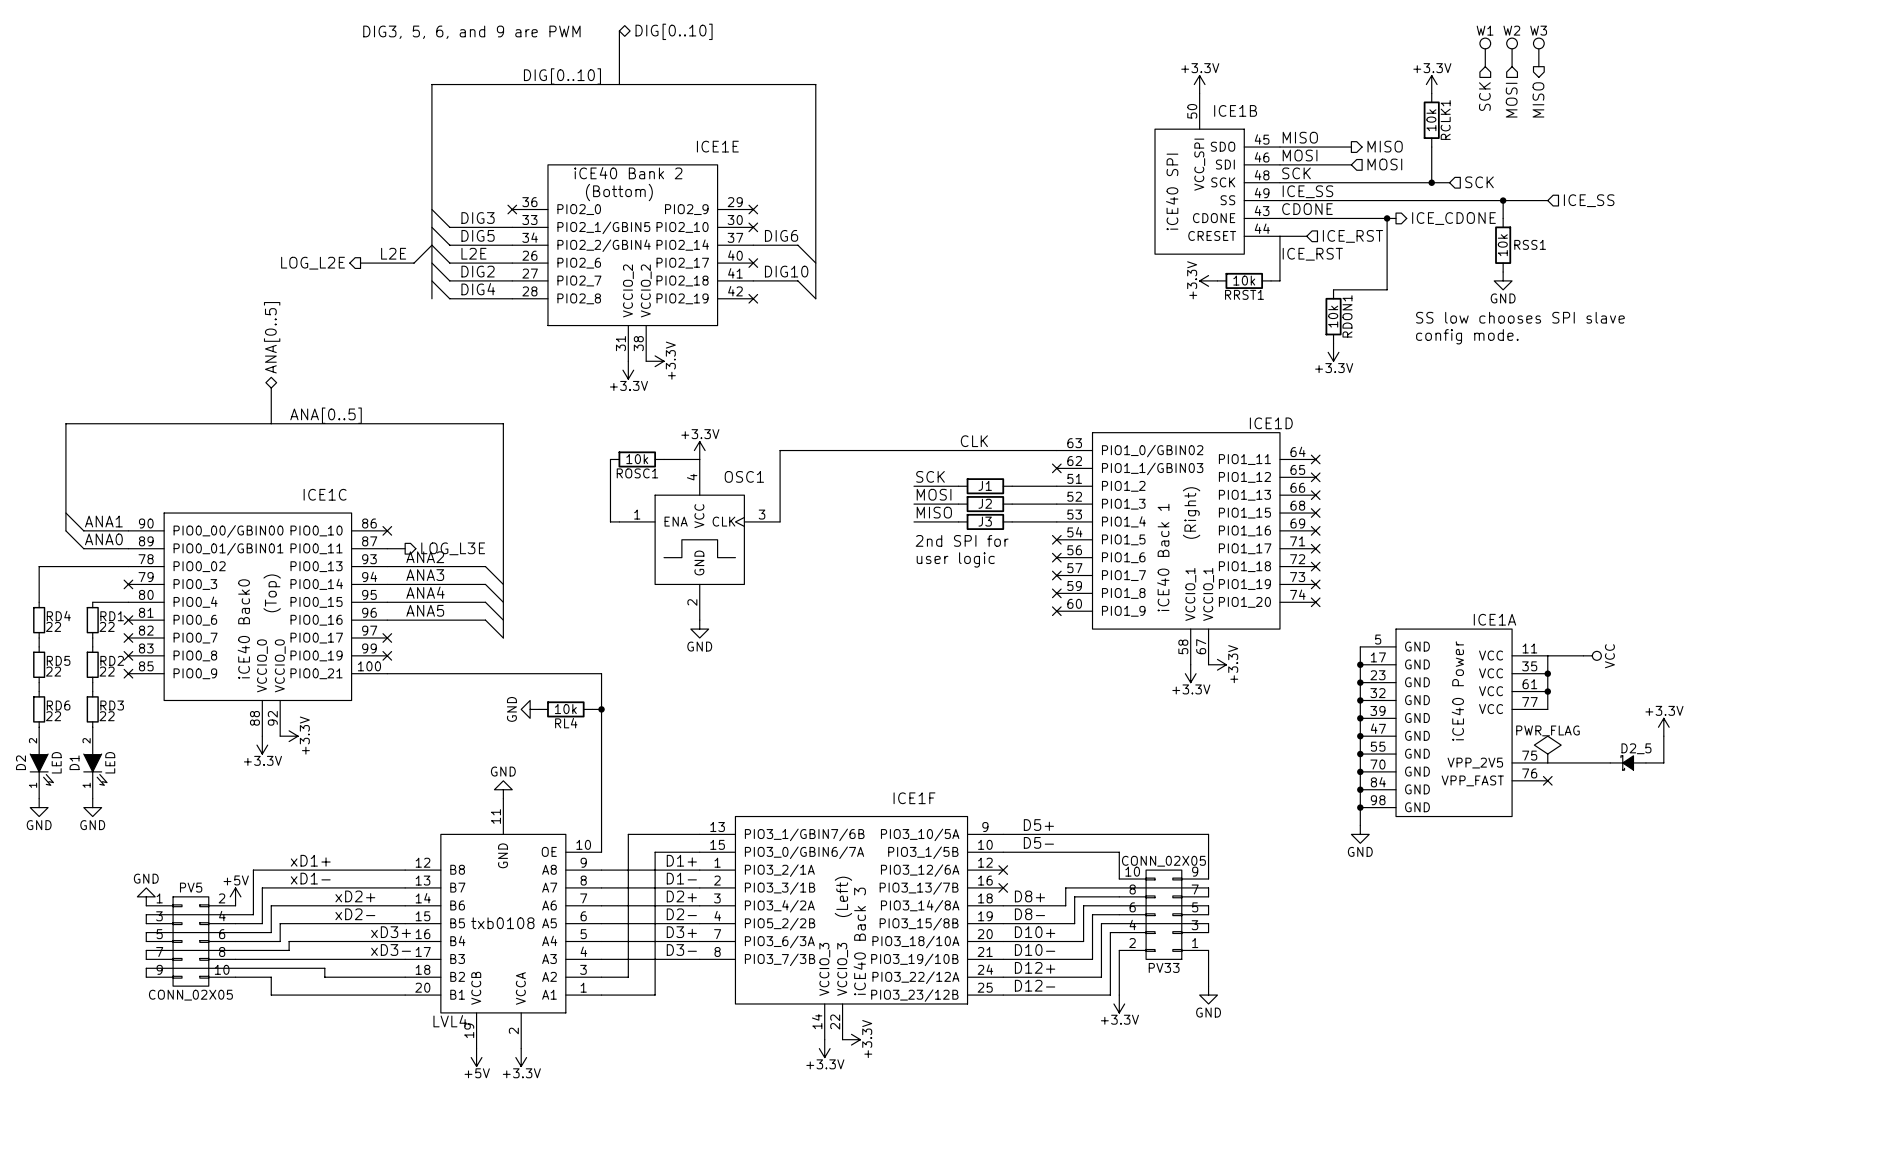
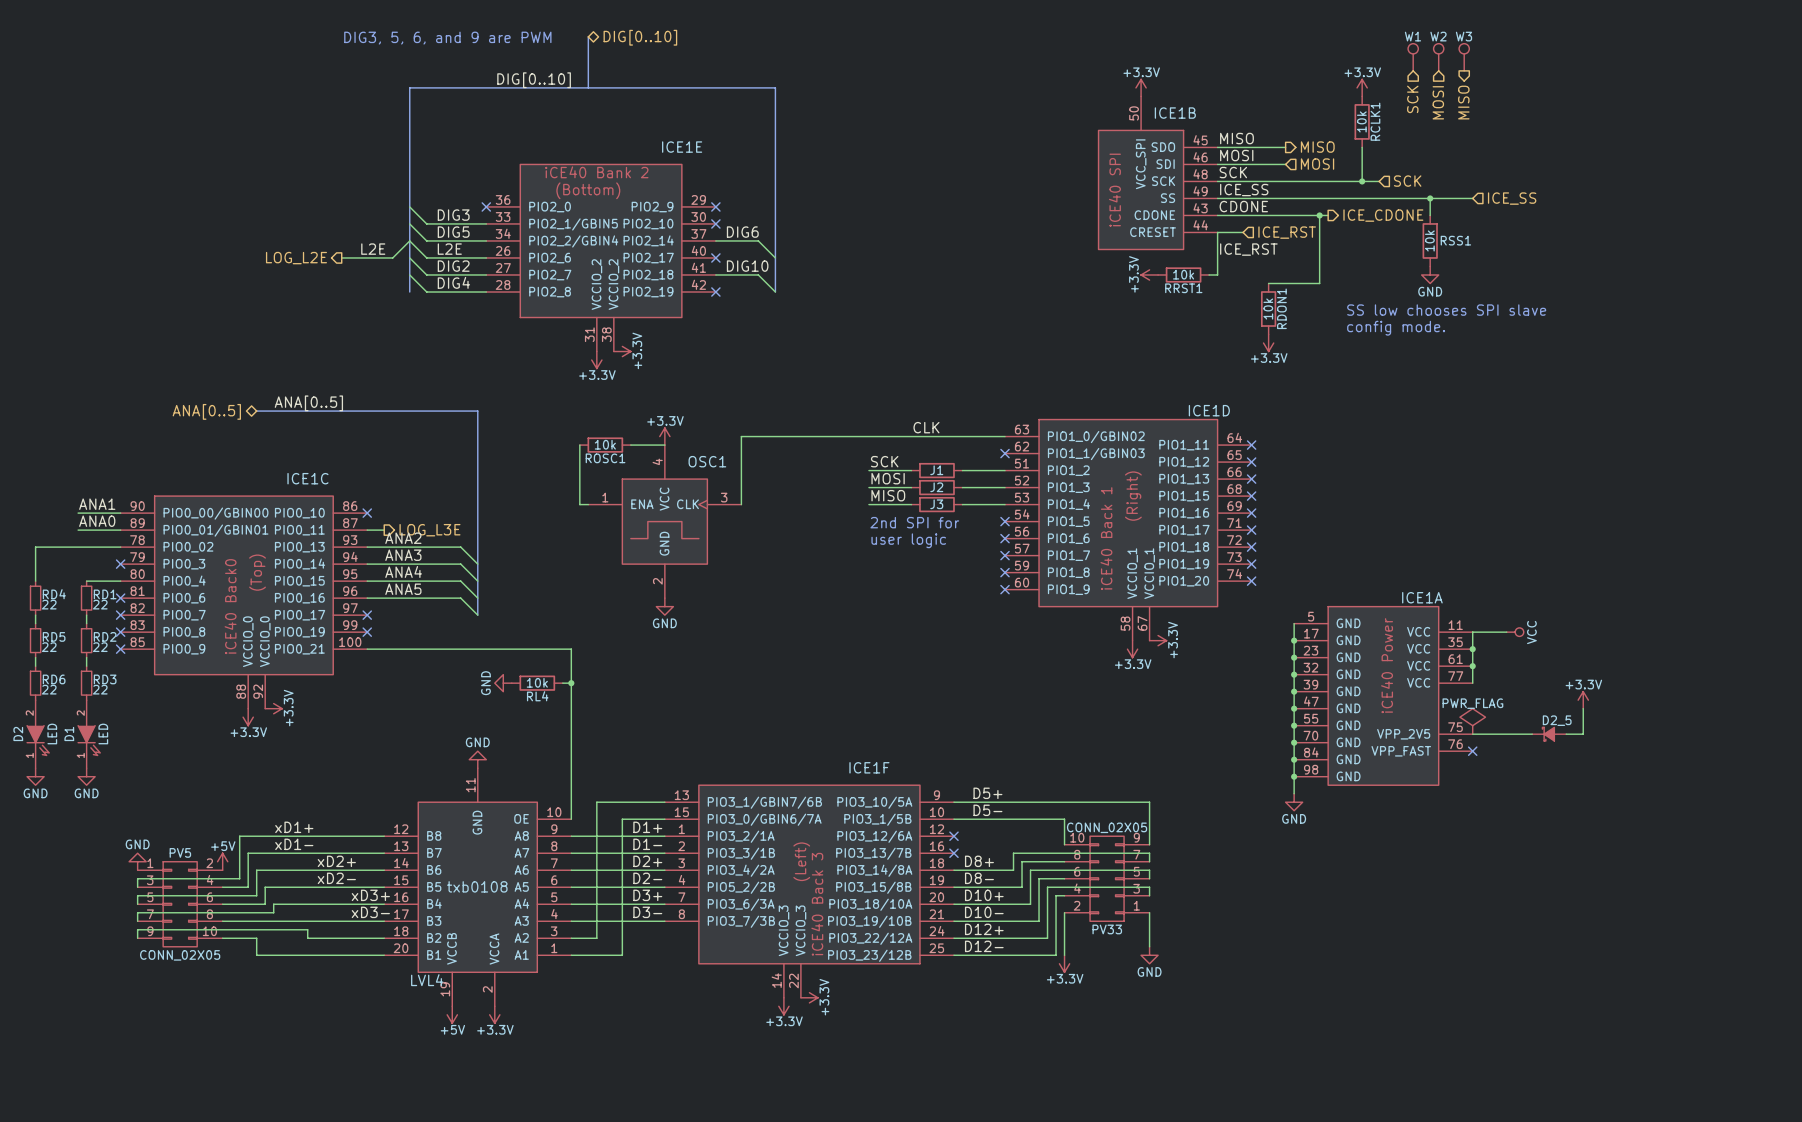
hierarchical label rotation: 0° (272, 337) -> 90° counterclockwise (206, 411)
hierarchical label position: ANA[0..5] (272, 337) -> ANA[0..5] (206, 411)
bus: (271, 388) (271, 423) (65, 423) (65, 530) -> none
wire: (65, 513) (83, 530) -> none
wire: (65, 530) (83, 548) -> none

